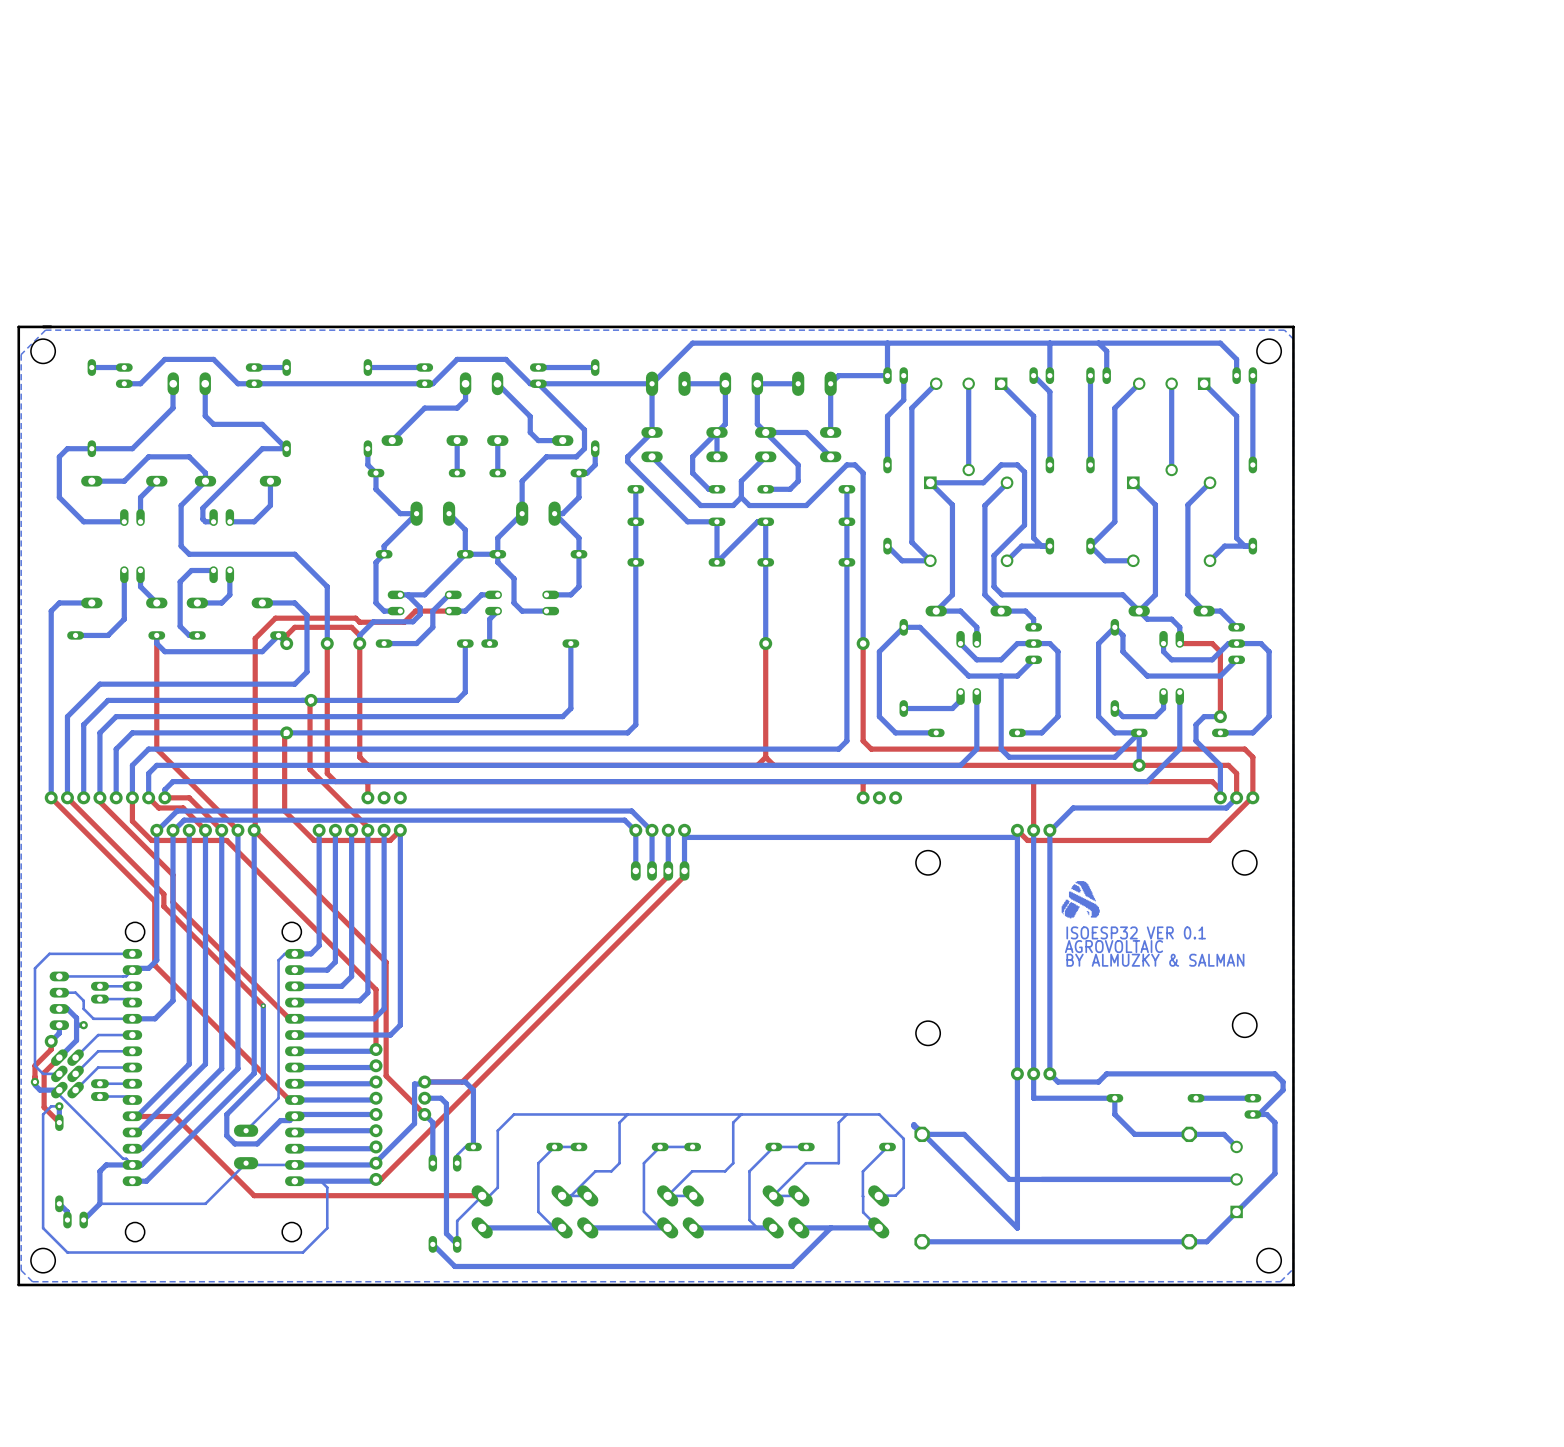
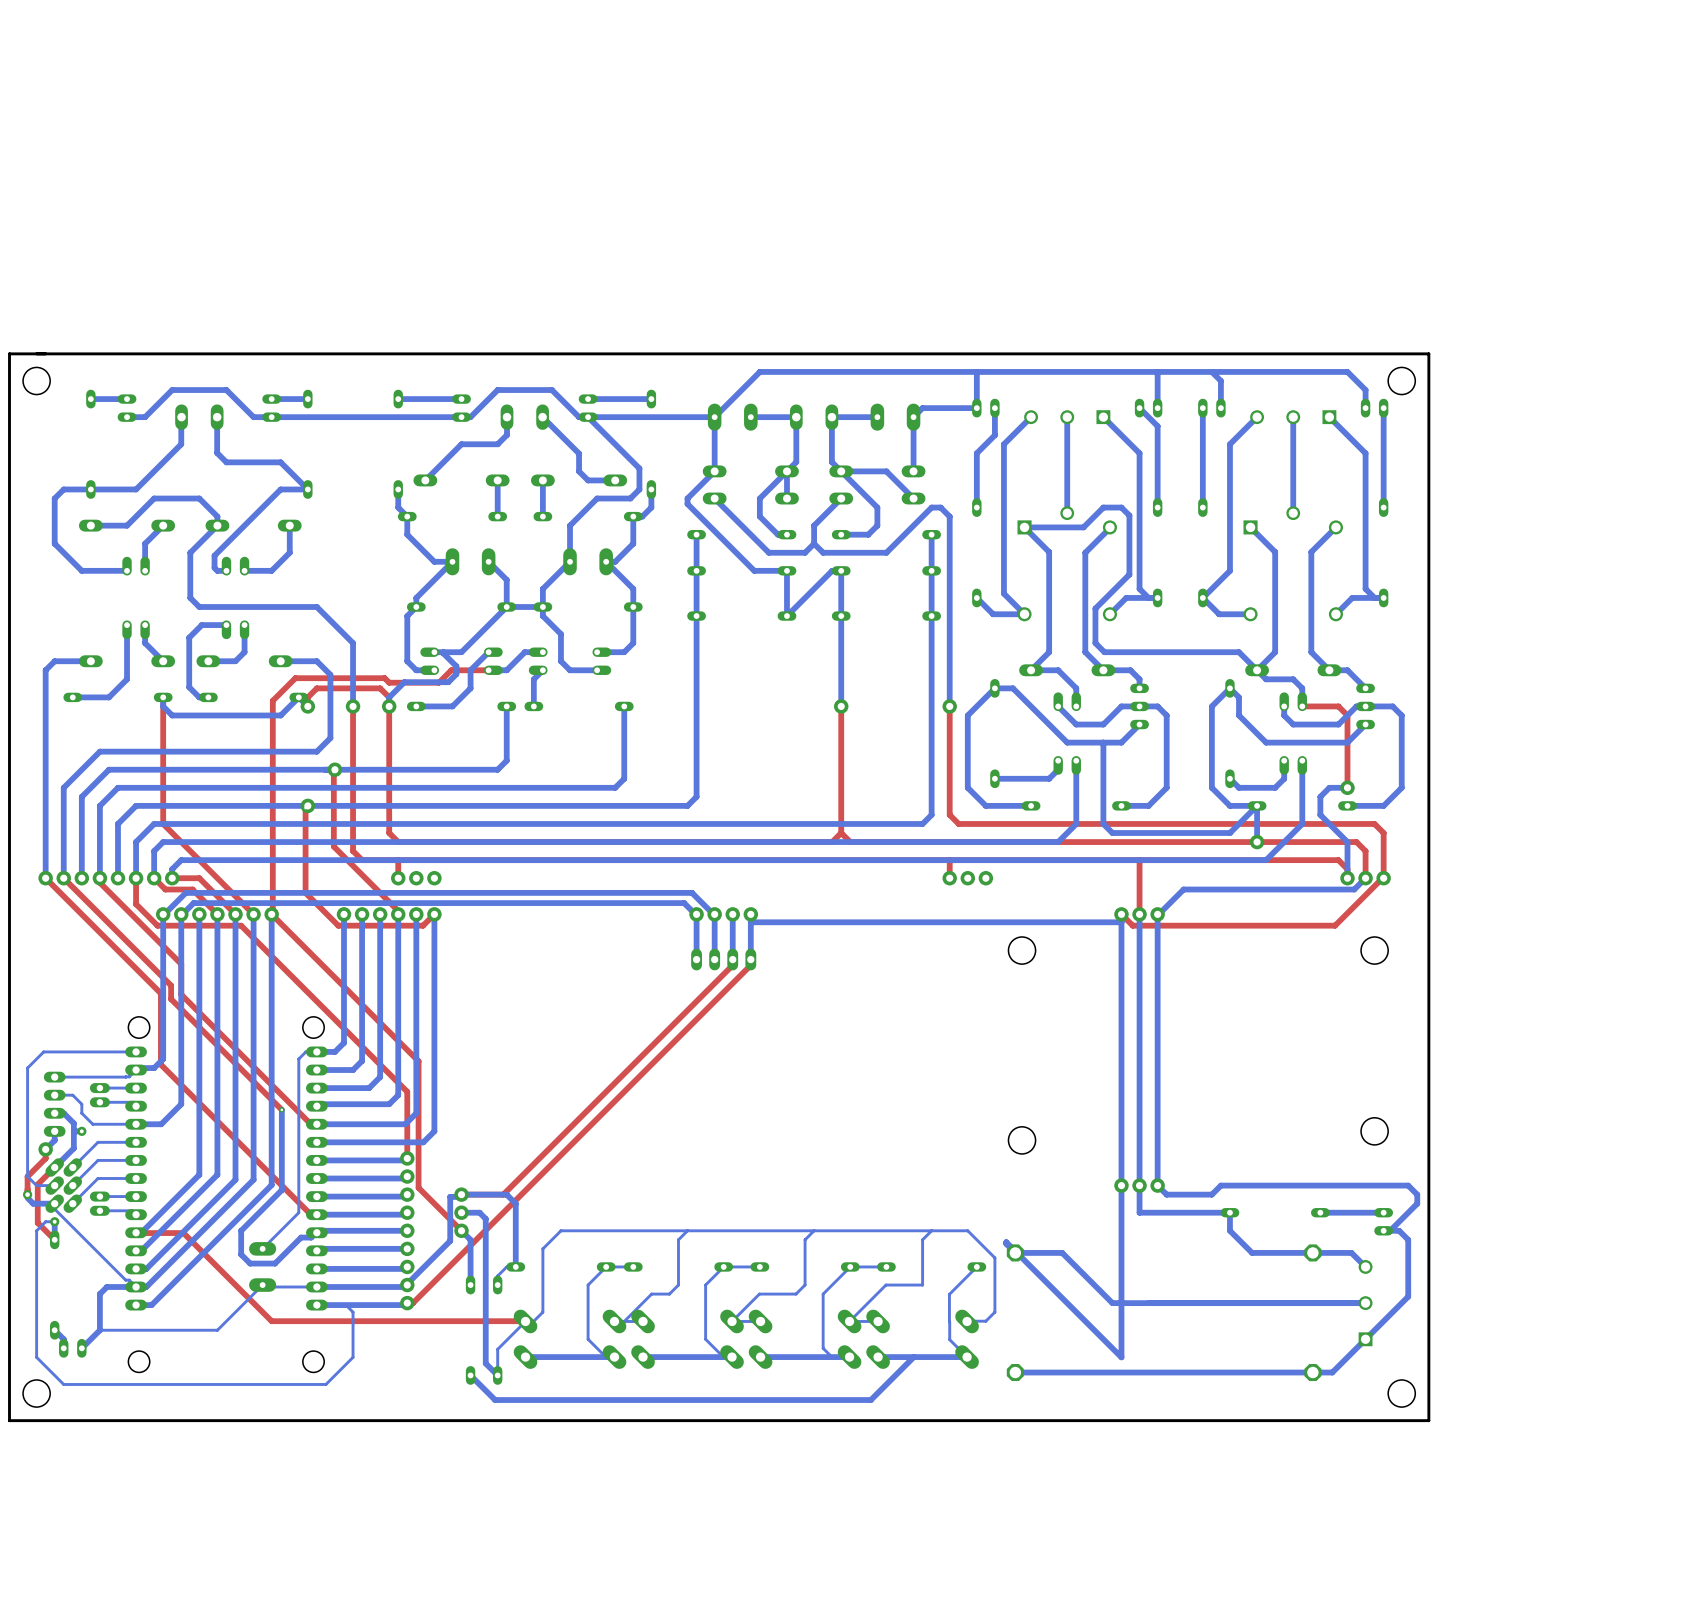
bottom zone outline: (1284, 330) (45, 330) (21, 354) (21, 1270) (32, 1281) (1280, 1281) (1293, 1268) (1293, 339) (1284, 330) -> none
drawing: [1061, 881, 1100, 919] -> none
text: ISOESP32 VER 0.1 (1136, 932) -> none
text: AGROVOLTAIC (1114, 946) -> none
text: BY ALMUZKY & SALMAN (1155, 960) -> none

